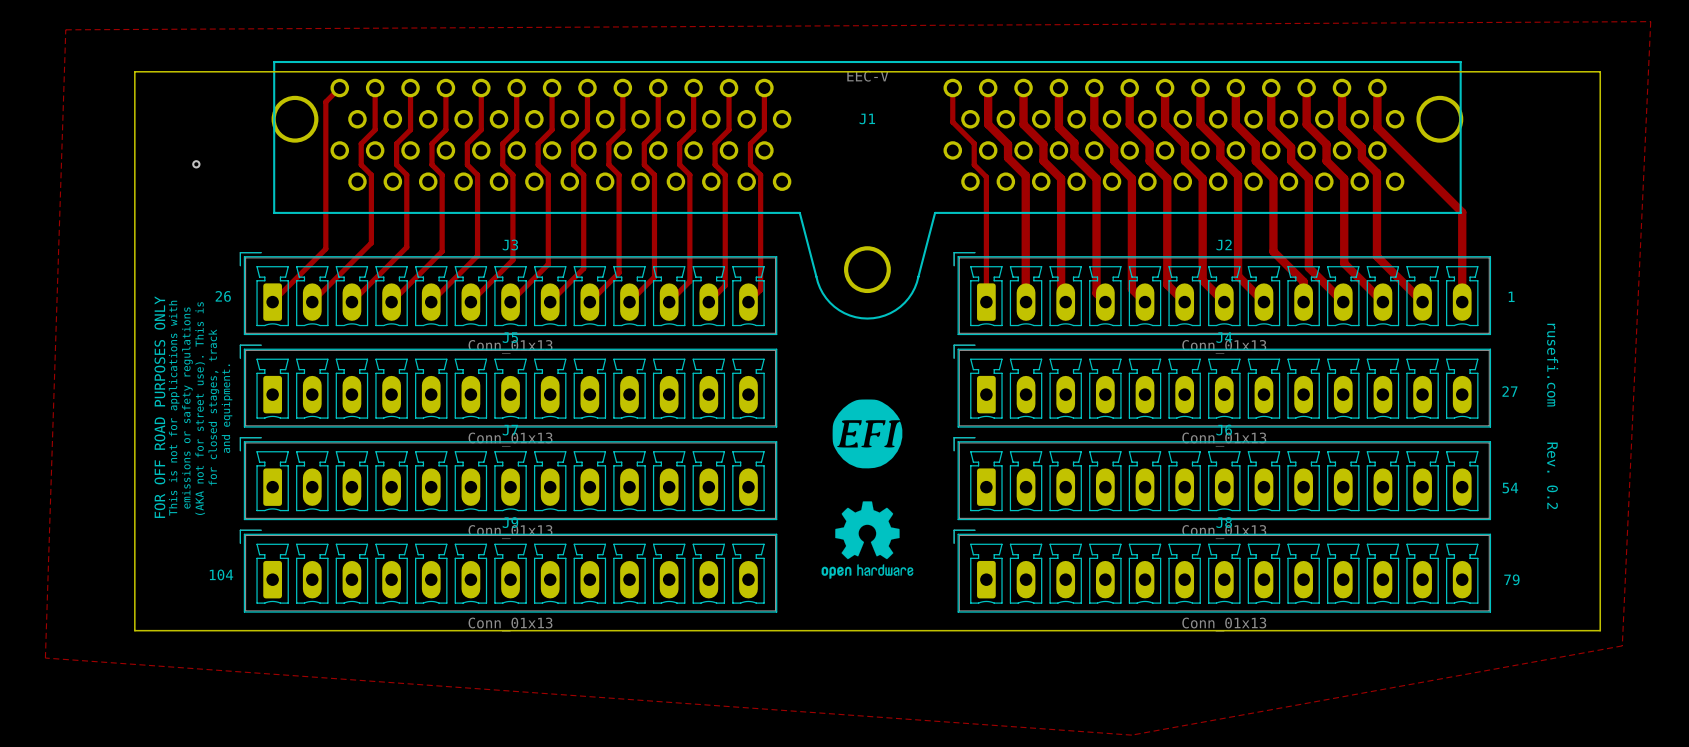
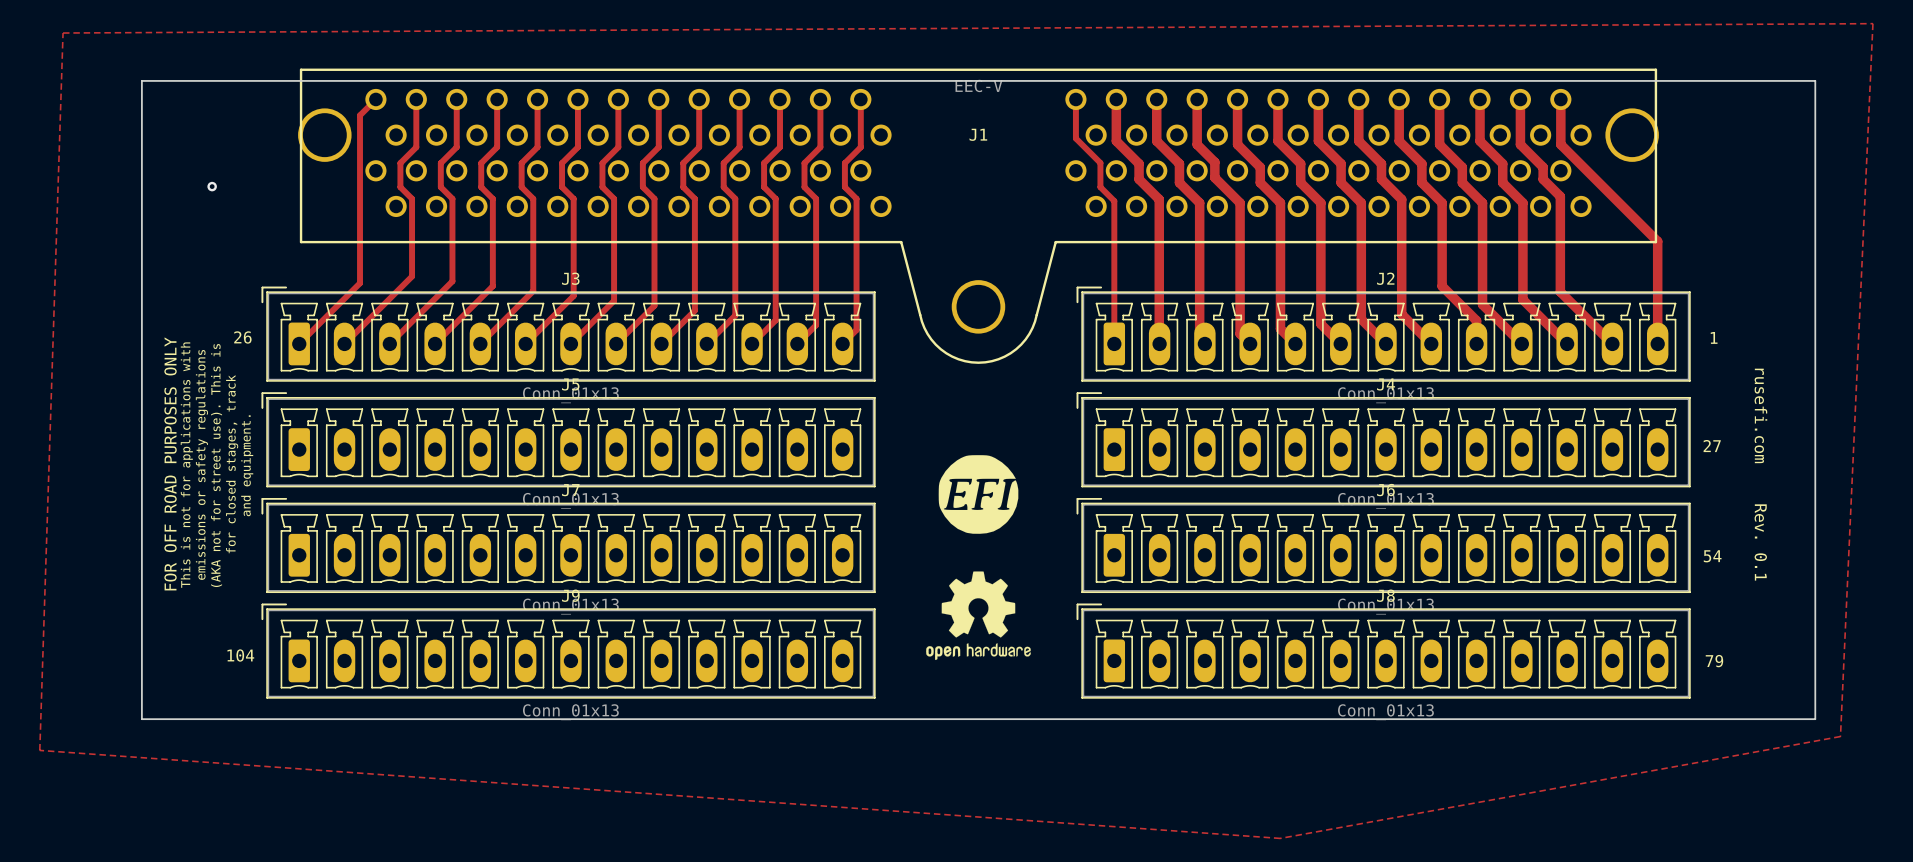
text: rusefi.com Rev. 0.2 (1552, 416) -> rusefi.com Rev. 0.1 (1760, 474)

